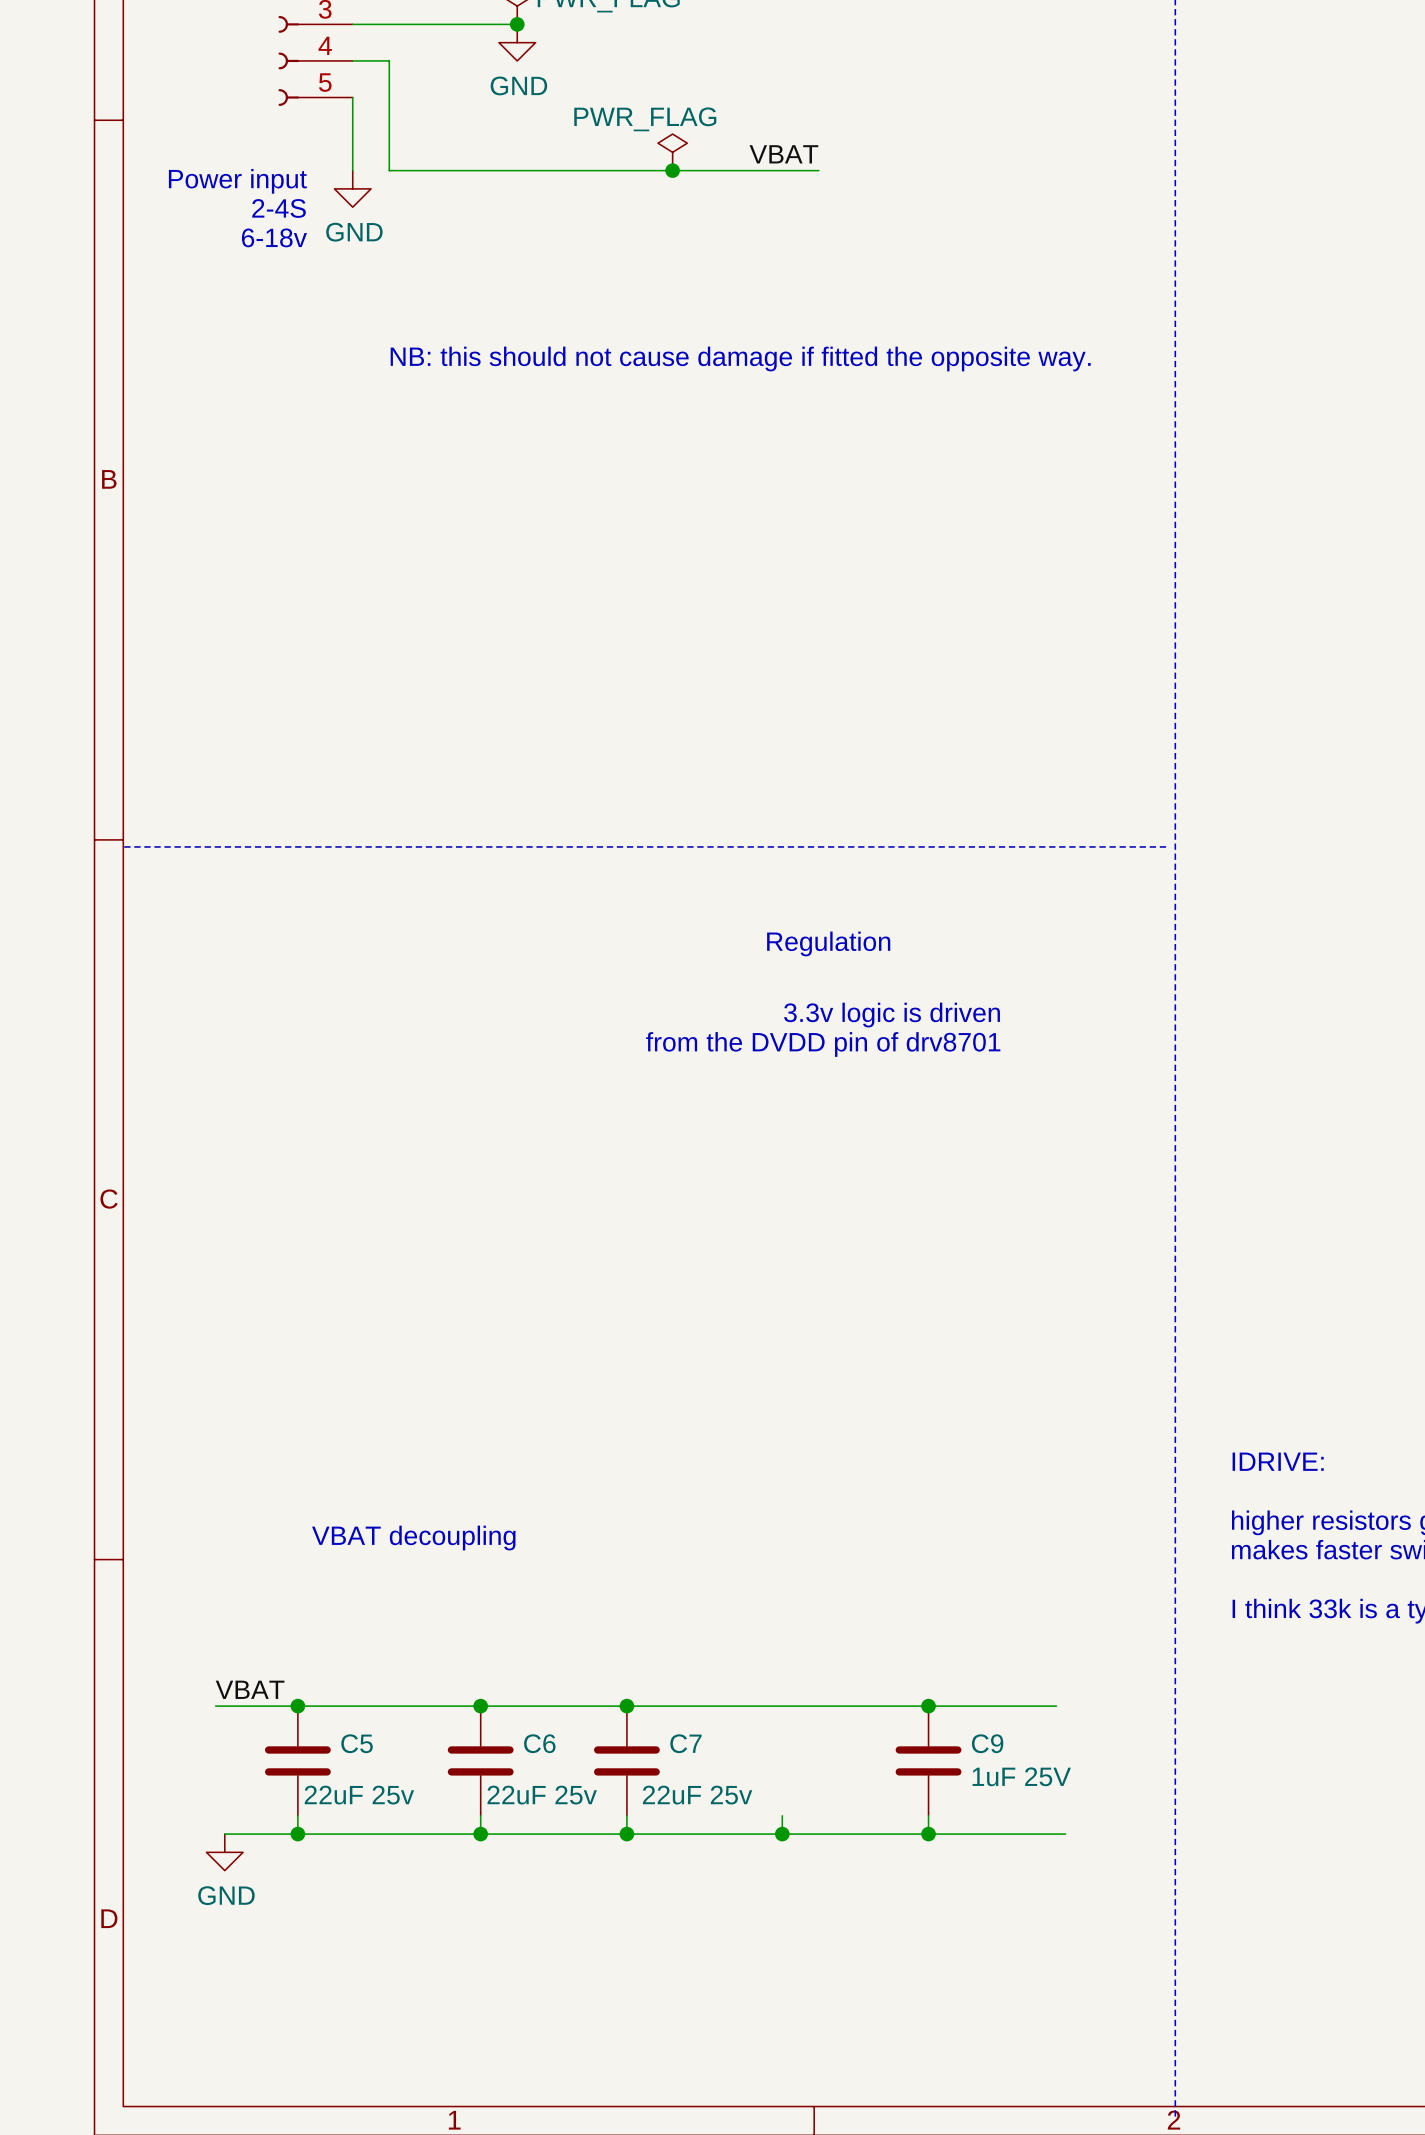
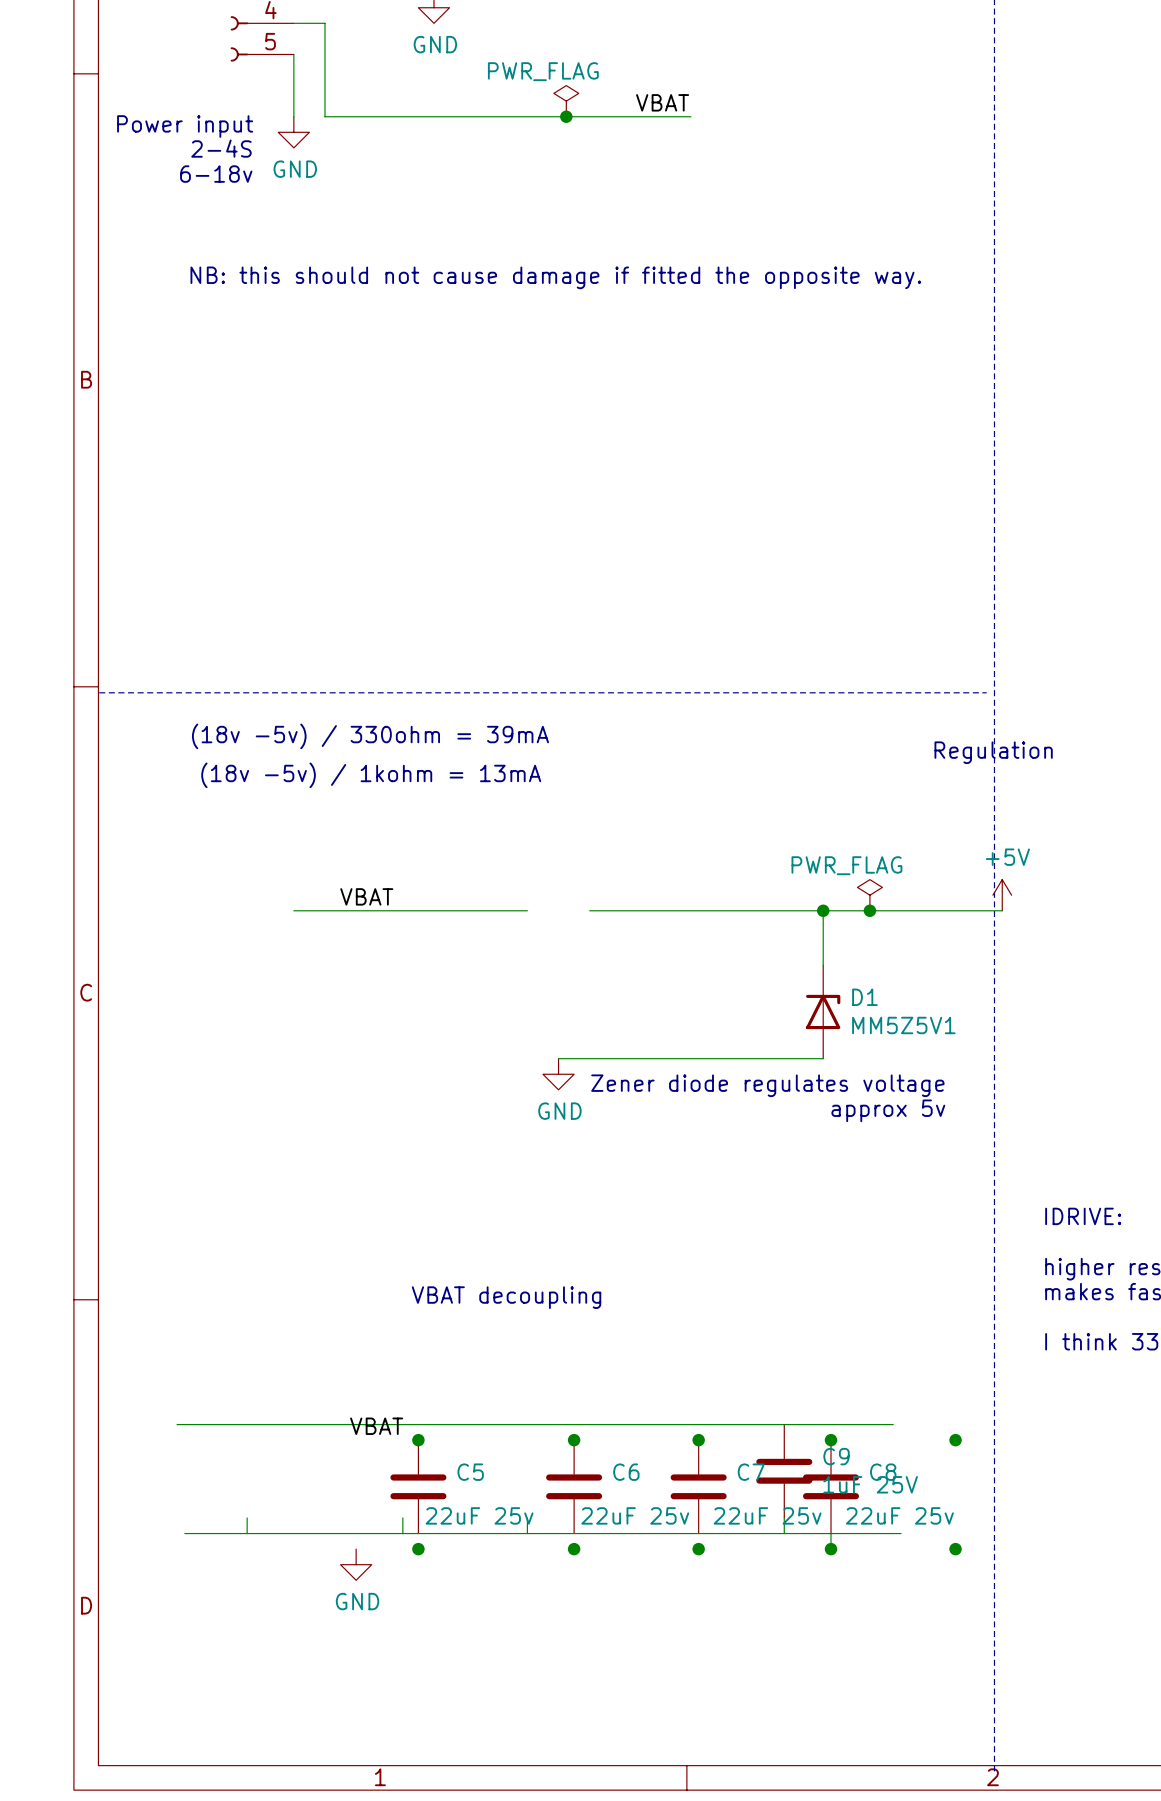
text: none -> (18v -5v) / 330ohm = 39mA (370, 736)
text: none -> (18v -5v) / 1kohm = 13mA (371, 775)
text position: Regulation (828, 943) -> Regulation (993, 752)
text: 3.3v logic is driven (892, 1015) -> none
text: from the DVDD pin of drv8701 (823, 1044) -> none
power symbol: none -> PWR_FLAG (869, 895)
power symbol: none -> +5V (1002, 895)
label: none -> VBAT (366, 896)
wire: none -> (293, 910) (527, 910)
wire: none -> (589, 910) (1002, 910)
wire: none -> (823, 910) (823, 965)
junction: none -> (823, 910)
junction: none -> (869, 910)
D1: none -> MM5Z5V1 (823, 1011)
wire: none -> (558, 1058) (823, 1058)
power symbol: none -> GND (558, 1074)
text: none -> Zener diode regulates voltage (767, 1085)
text: none -> approx 5v (888, 1110)
text position: VBAT decoupling (413, 1538) -> VBAT decoupling (506, 1297)
label position: VBAT (250, 1689) -> VBAT (376, 1426)
junction: (297, 1706) -> none
junction position: (480, 1706) -> (418, 1440)
junction position: (626, 1706) -> (574, 1440)
junction: (928, 1706) -> none
junction: none -> (698, 1440)
junction: none -> (831, 1440)
junction: none -> (955, 1440)
C5 position: (297, 1760) -> (418, 1486)
C6 position: (480, 1760) -> (574, 1486)
C7 position: (626, 1760) -> (698, 1486)
C8: none -> 22uF 25v (831, 1486)
wire: (782, 1815) (782, 1834) -> (831, 1533) (831, 1549)
junction: (297, 1834) -> none
junction position: (480, 1834) -> (418, 1549)
junction: (626, 1834) -> none
junction position: (782, 1834) -> (698, 1549)
junction: (928, 1834) -> none
power symbol position: GND (224, 1852) -> GND (356, 1564)
junction: none -> (574, 1549)
junction: none -> (831, 1549)
junction: none -> (955, 1549)

